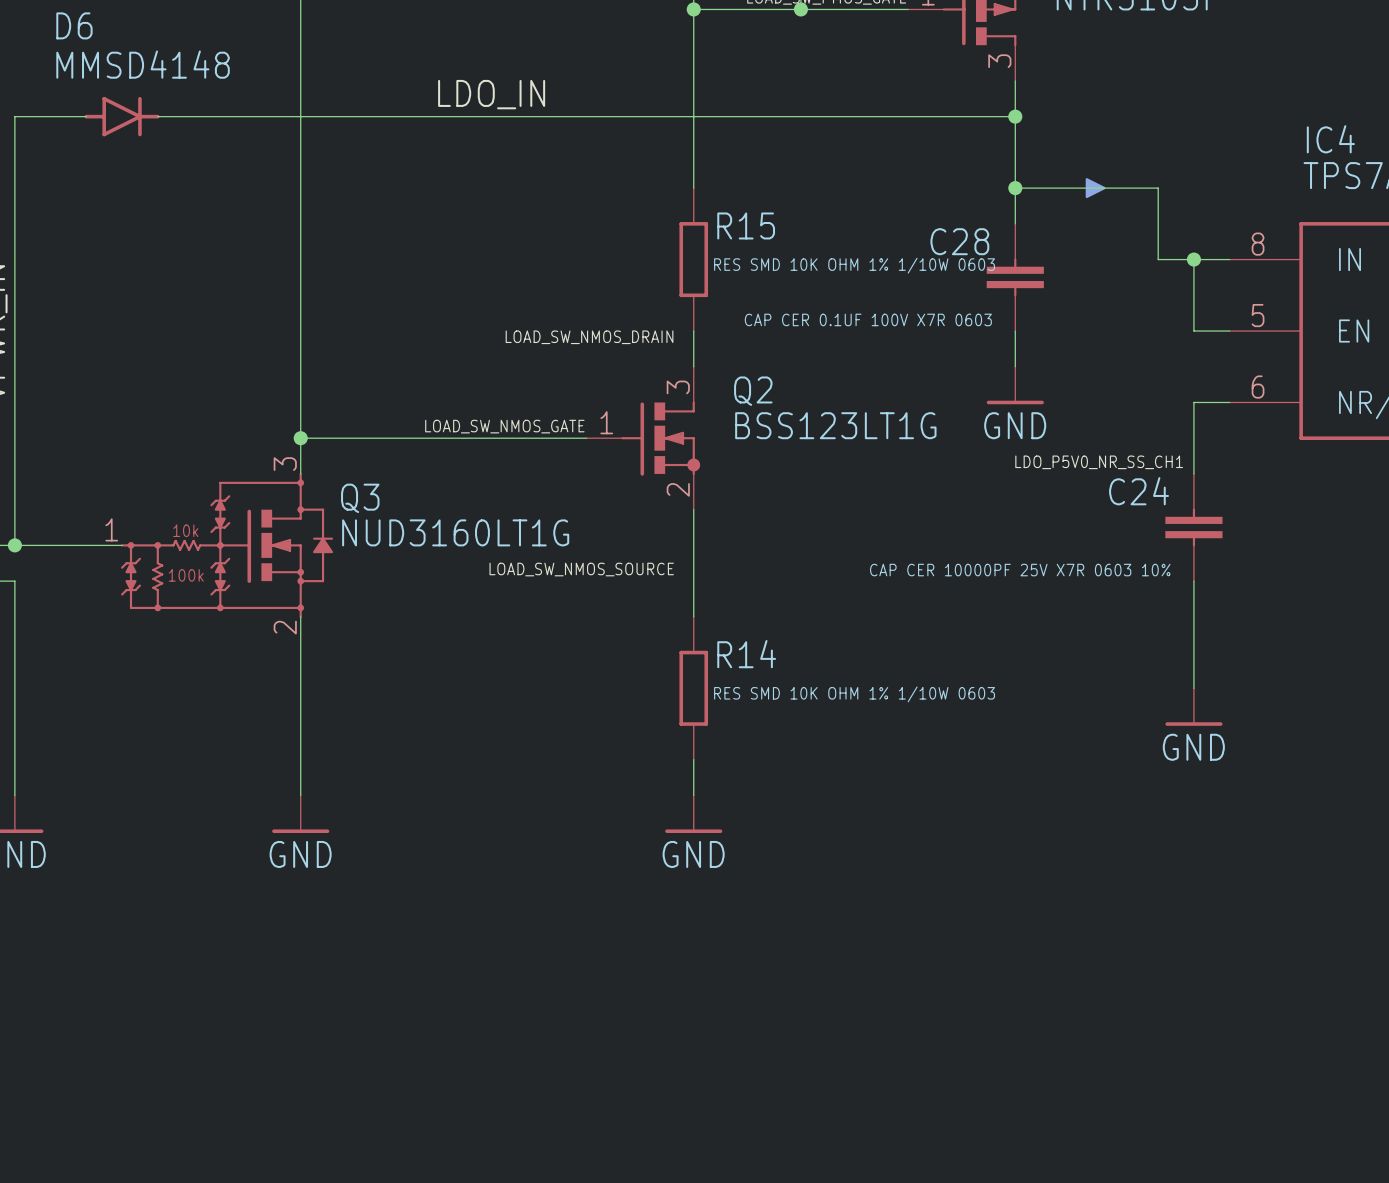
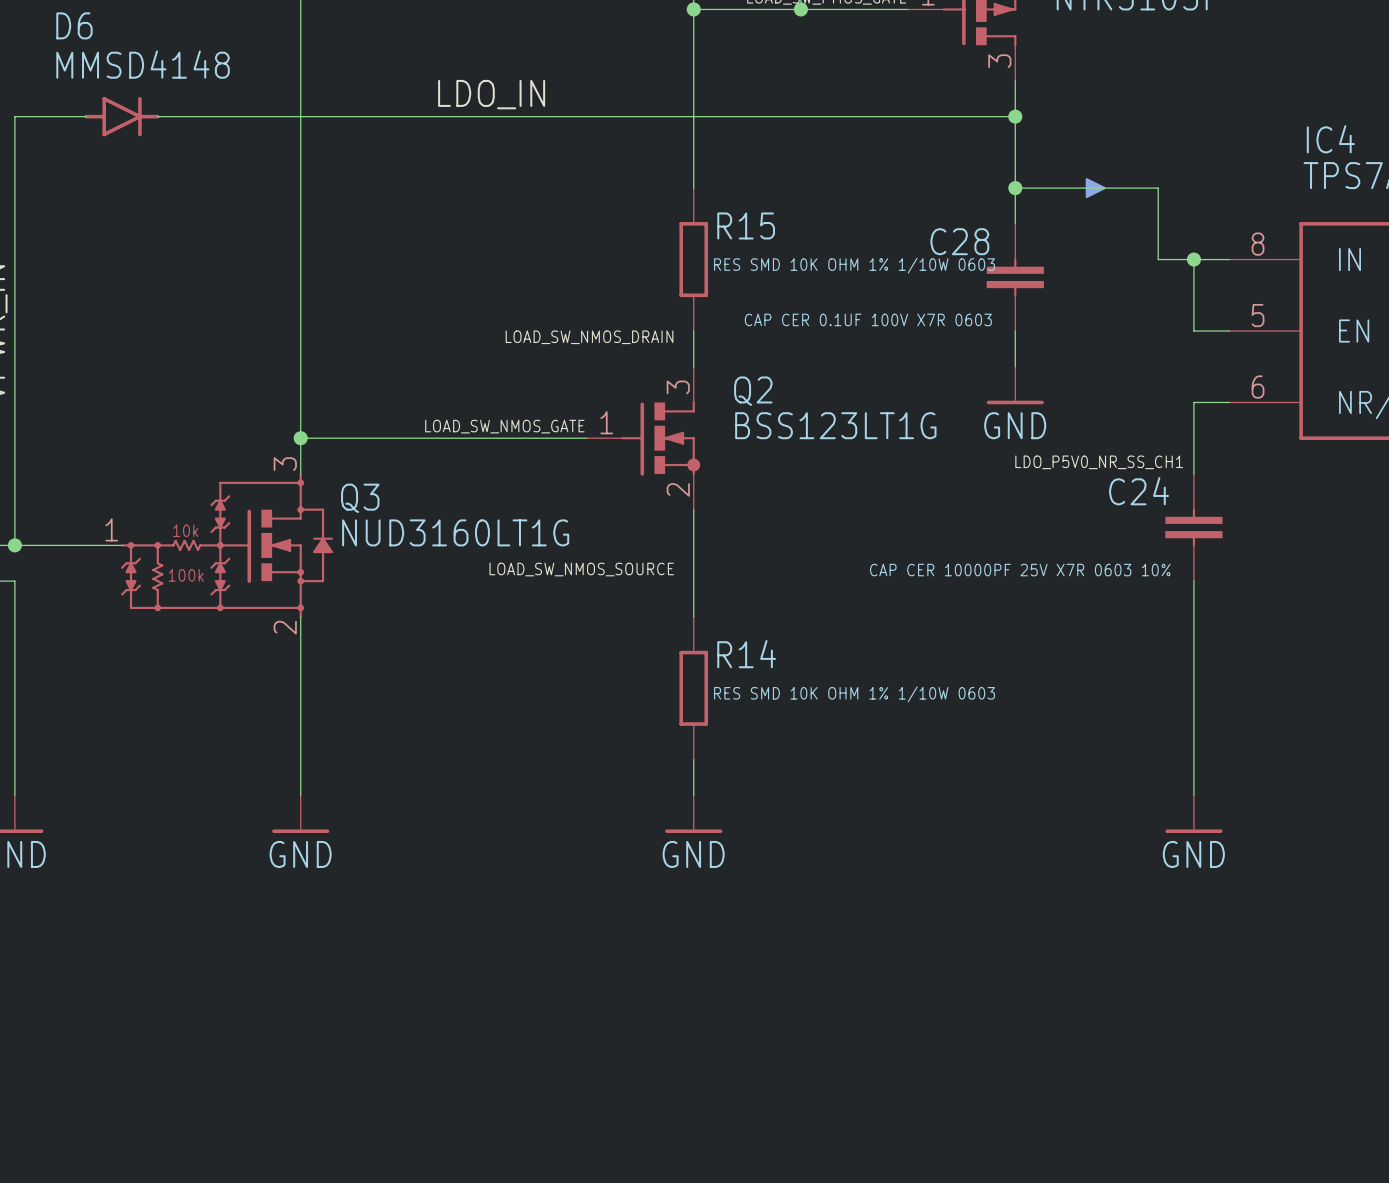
wire: none -> (1193, 688) (1193, 795)
power symbol position: GND (1193, 707) -> GND (1193, 814)

